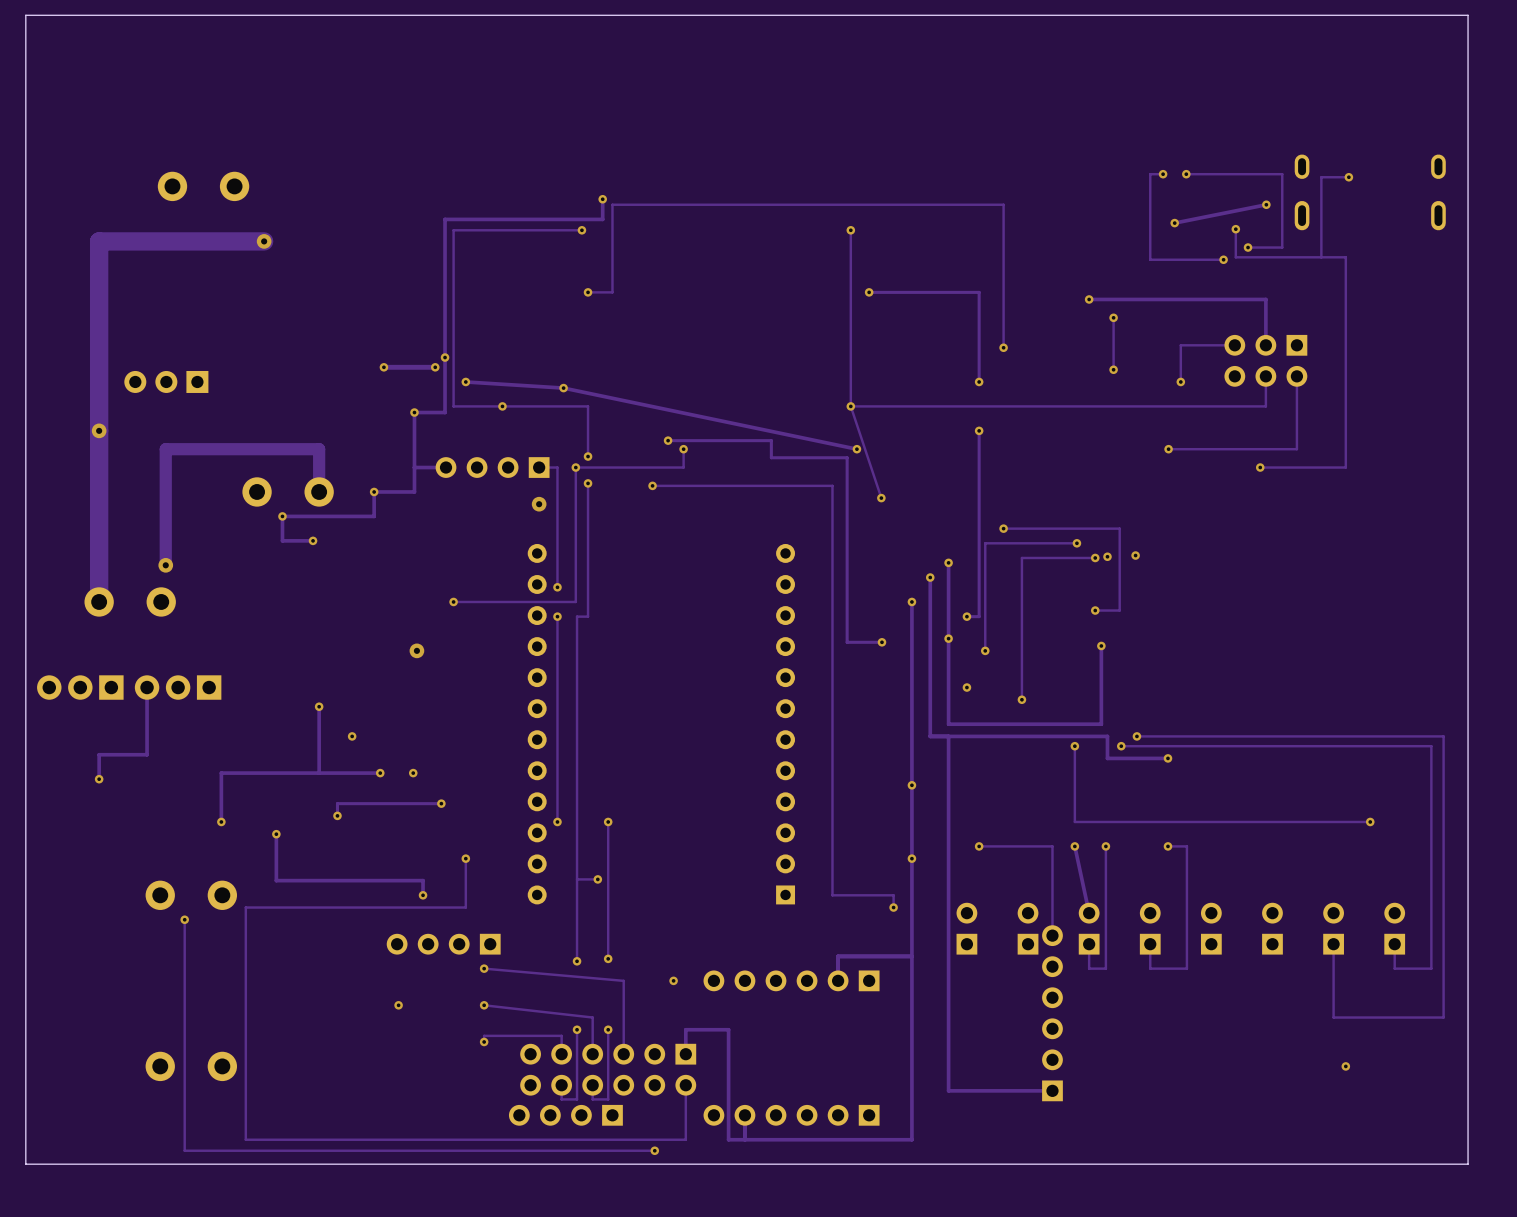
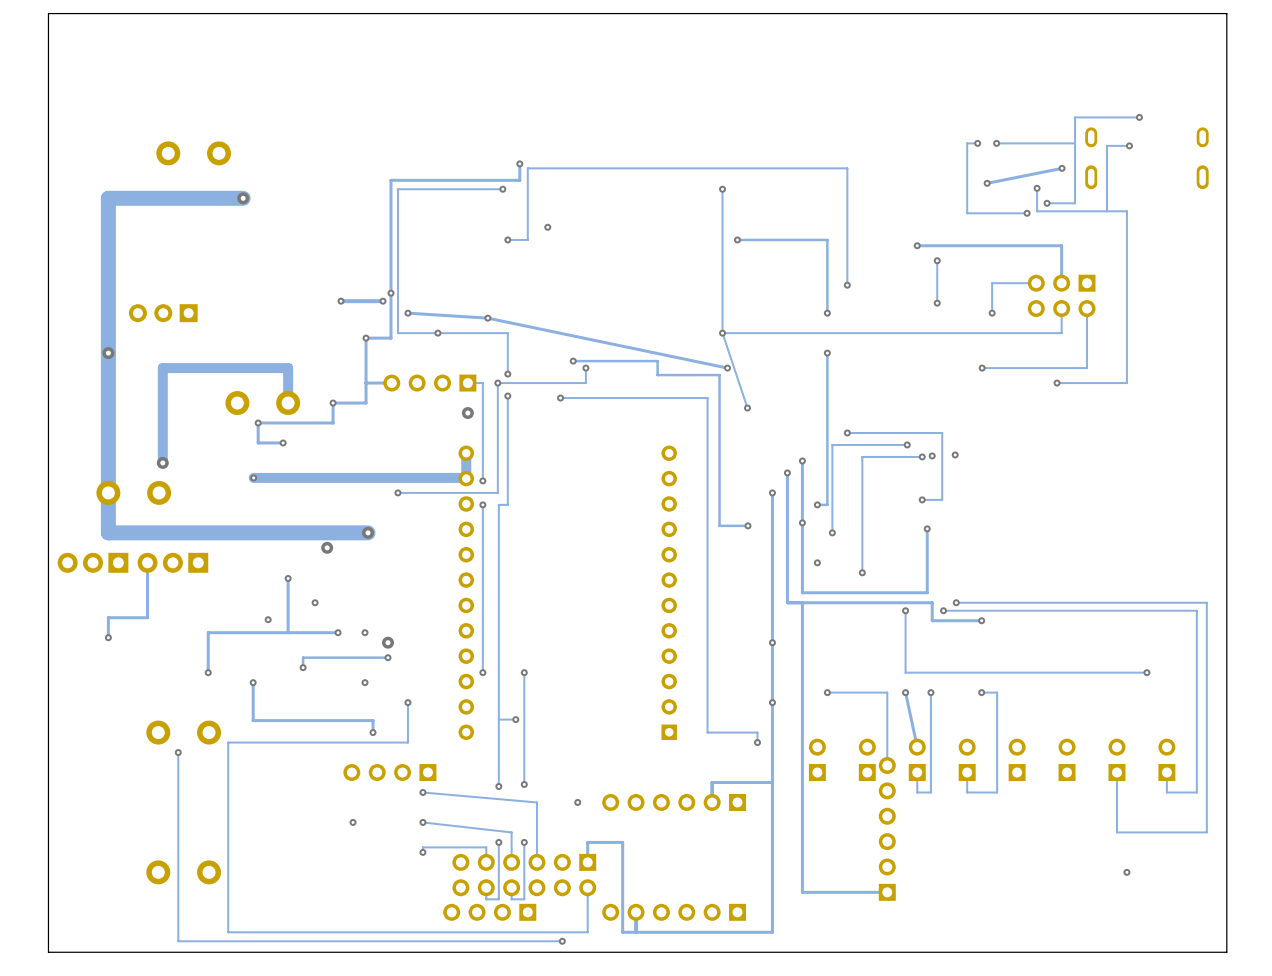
track: none -> (1139, 117) (1075, 117) (1075, 143)
via: none -> (1139, 117)
via: none -> (547, 227)
track: none -> (466, 453) (466, 477) (253, 477)
via: none -> (253, 477)
track: none -> (108, 492) (108, 532) (368, 532)
via: none -> (327, 547)
via: none -> (268, 619)
via: none -> (387, 642)
via: none -> (365, 682)

